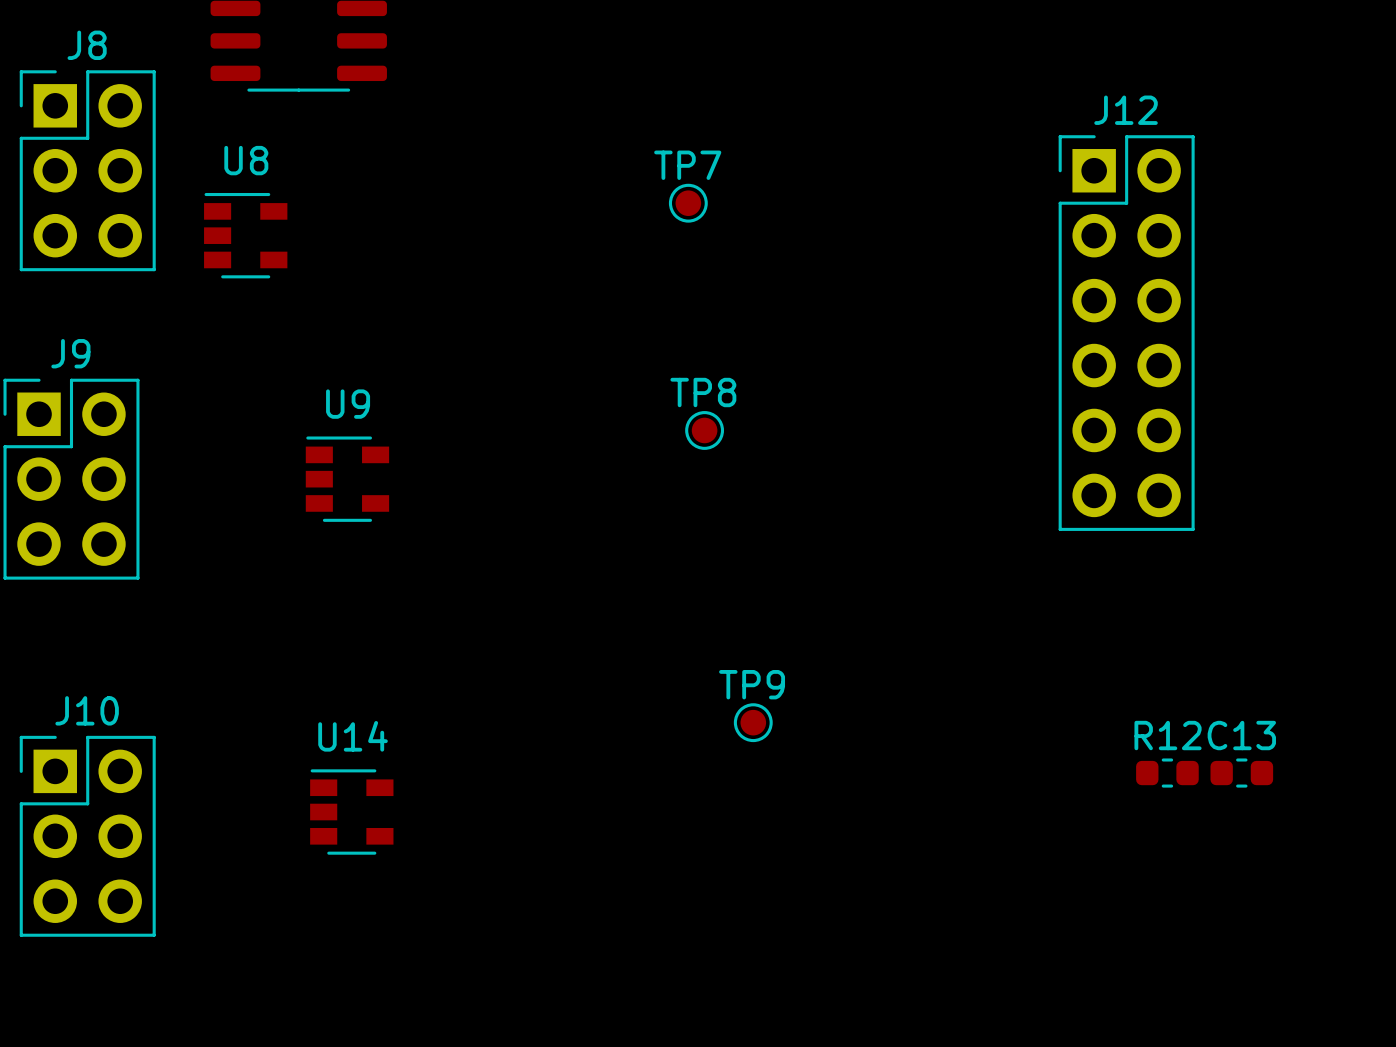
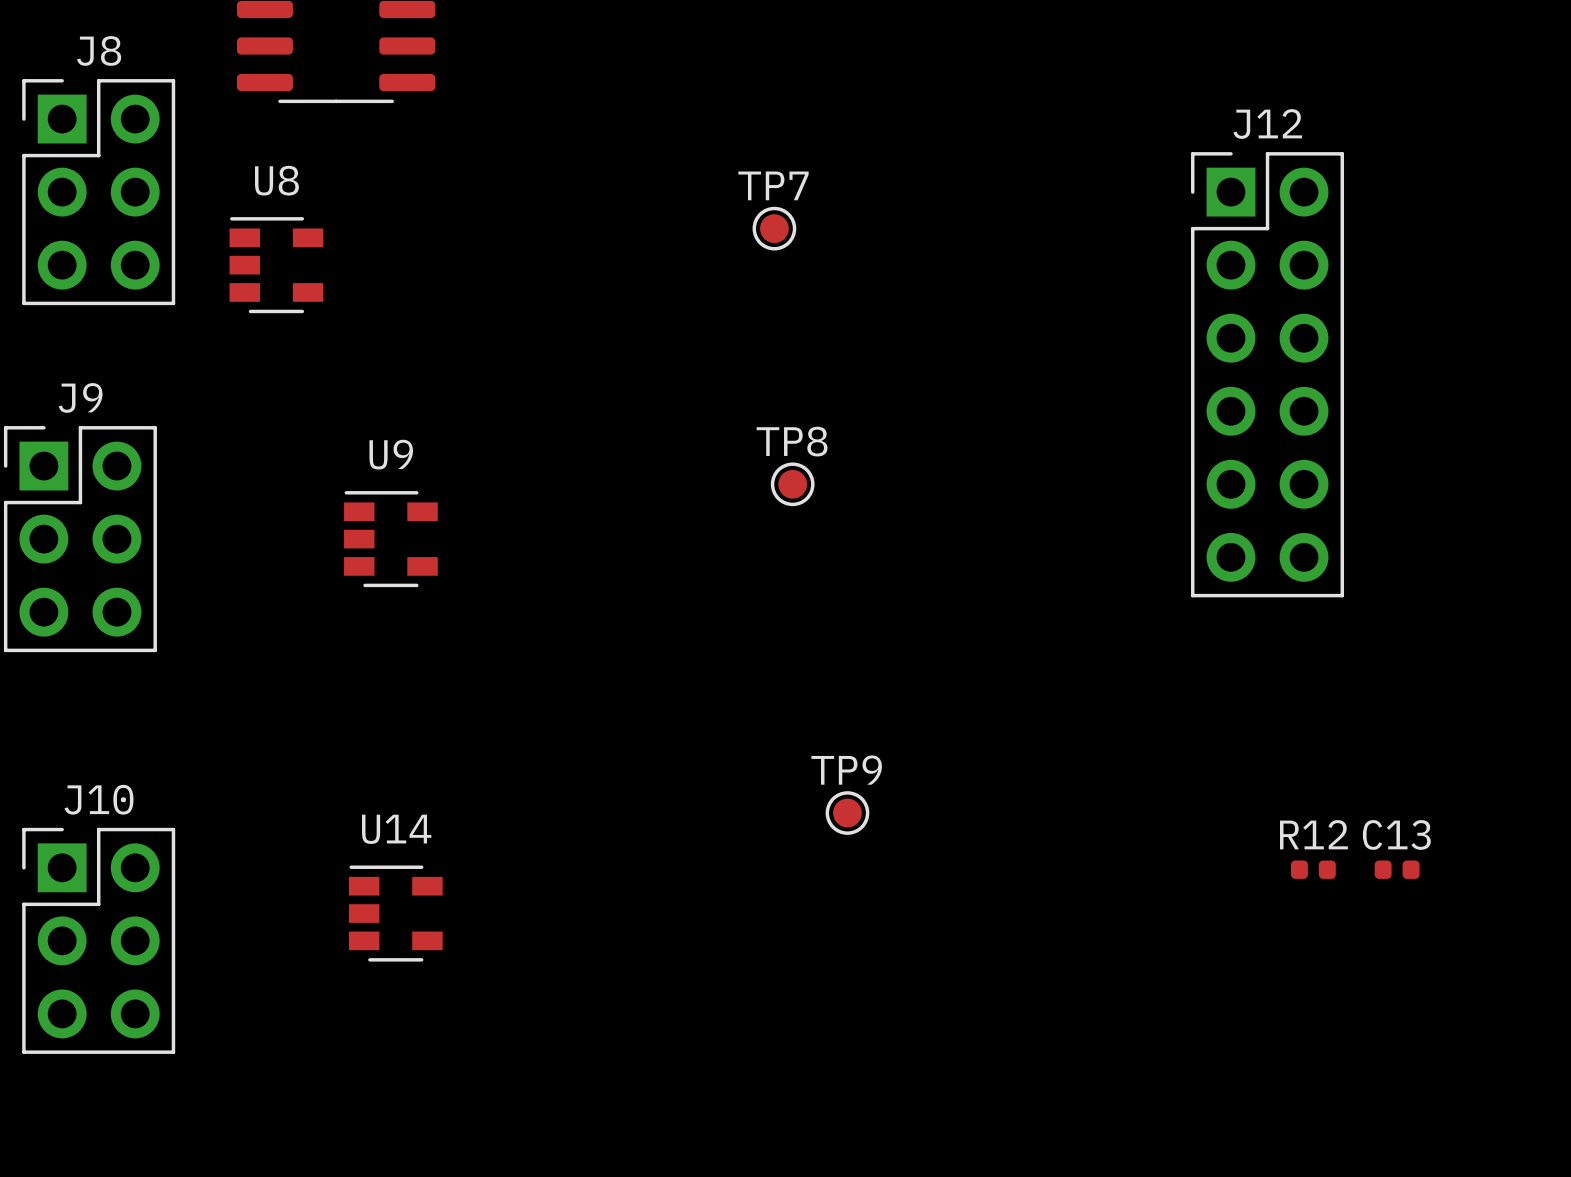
R12 footprint: [1136, 758, 1199, 788] -> [1290, 860, 1336, 879]
C13 footprint: [1210, 758, 1274, 788] -> [1374, 860, 1420, 879]

